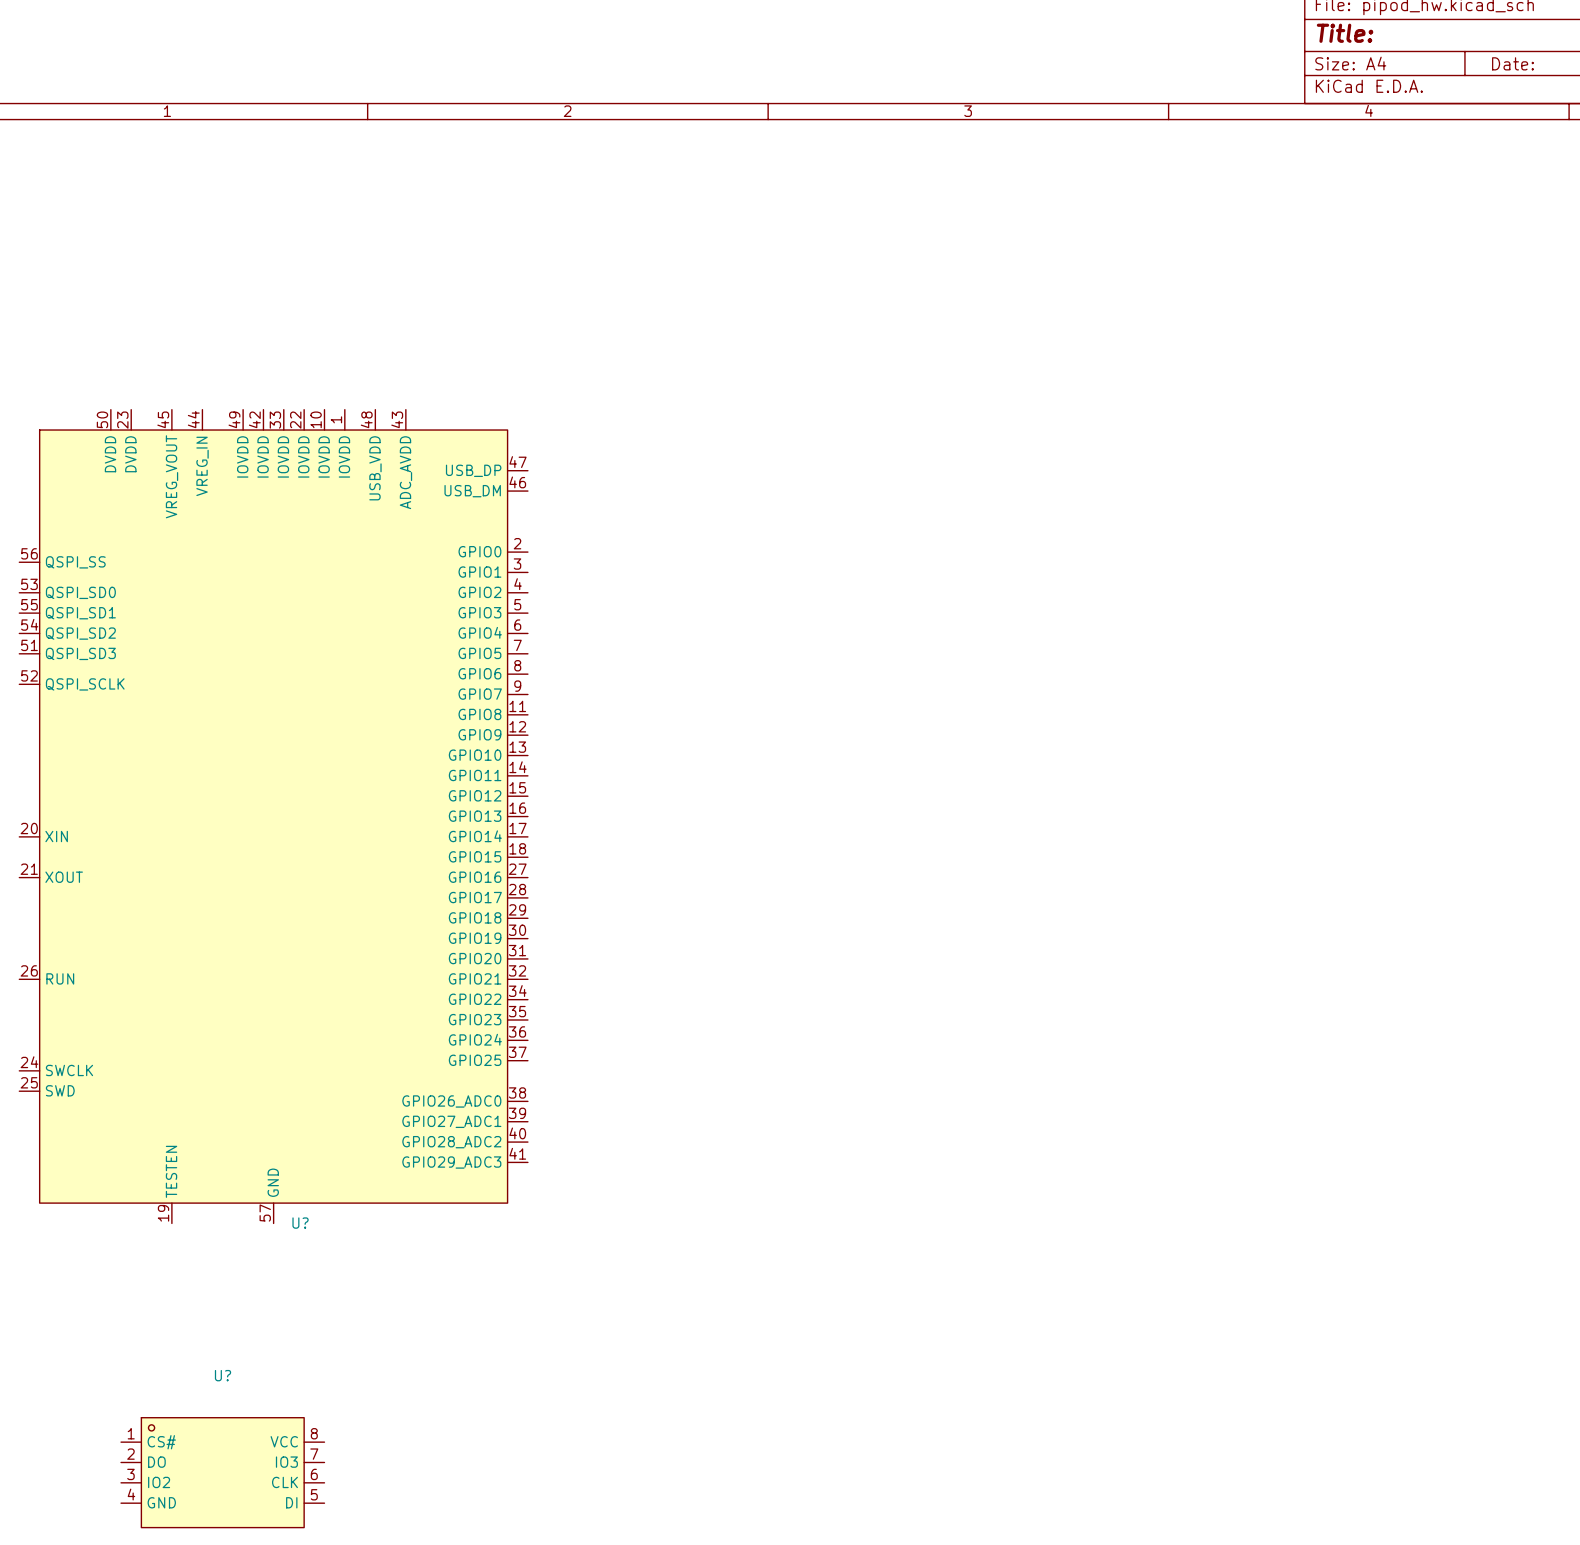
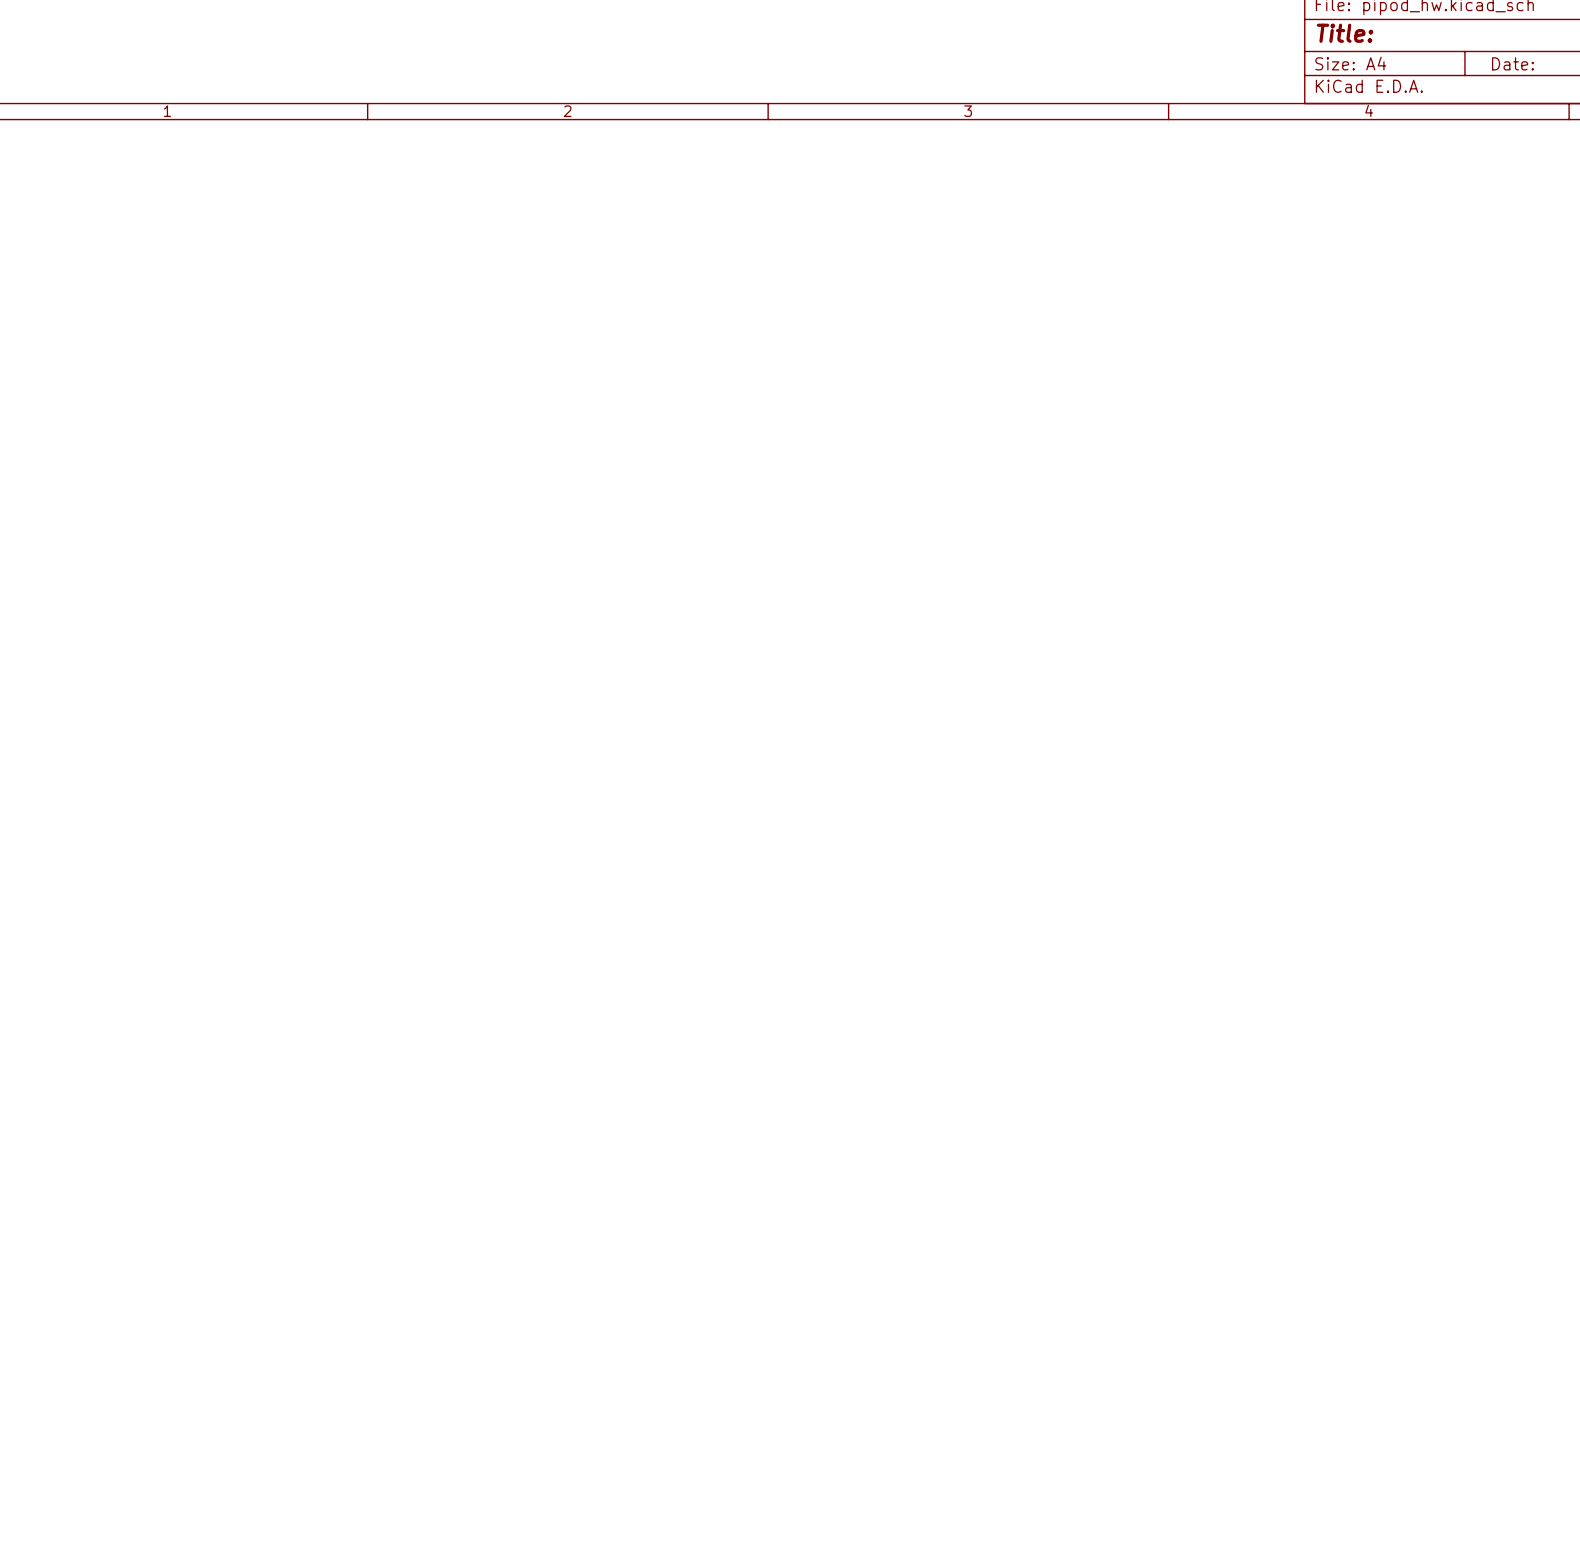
U?: (273, 816) -> none
U?: (222, 1472) -> none

